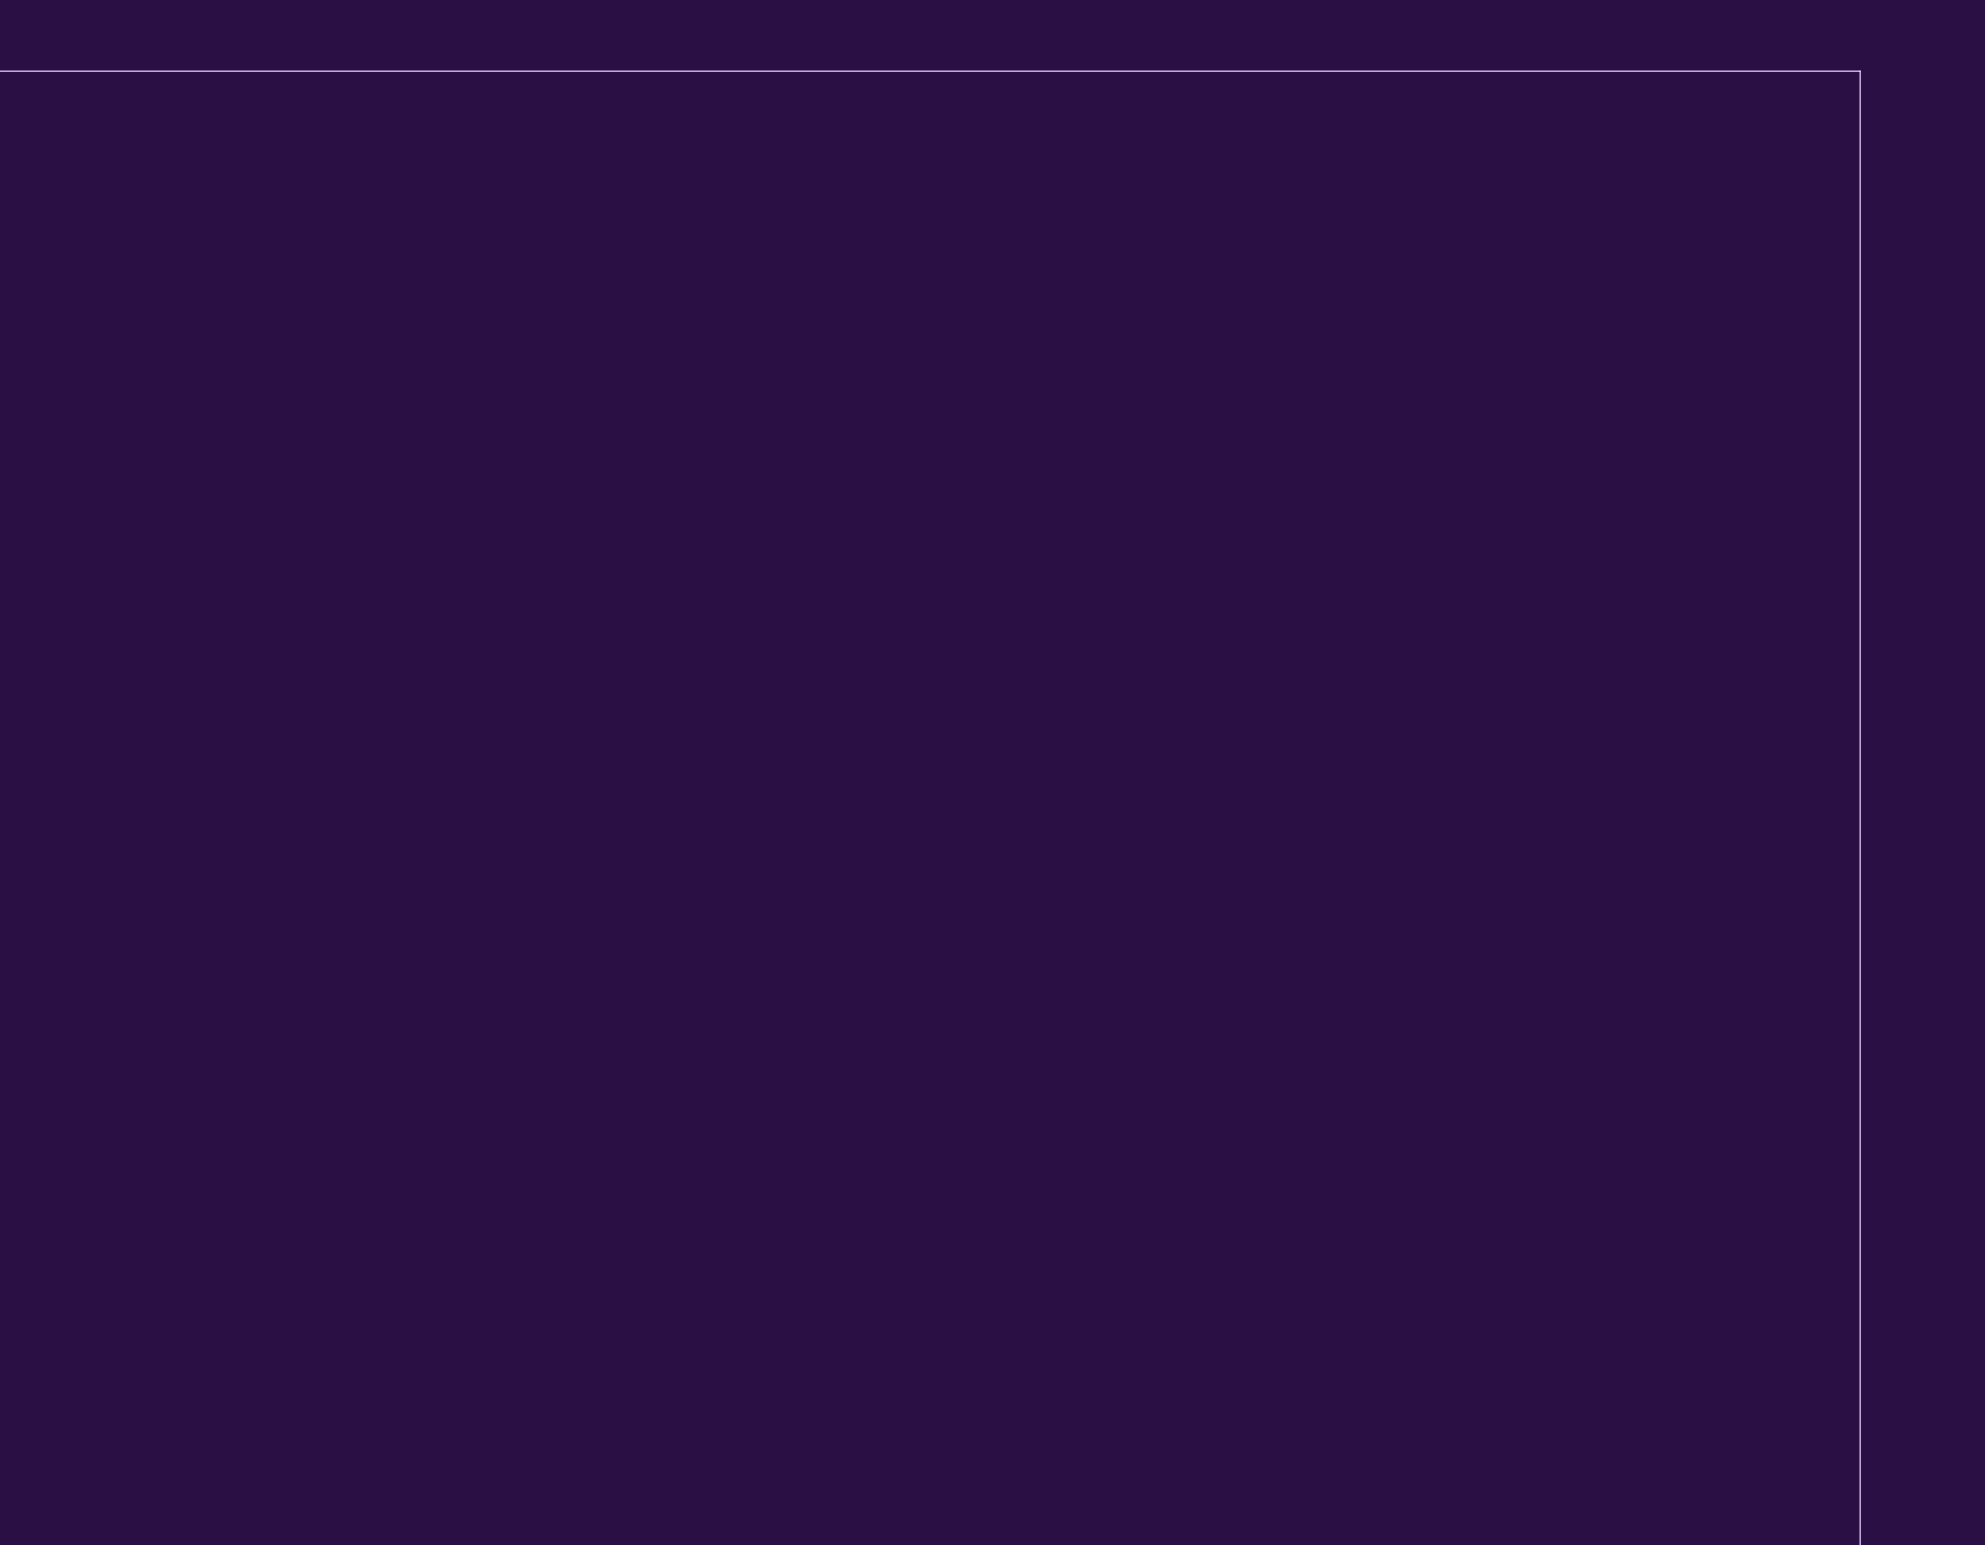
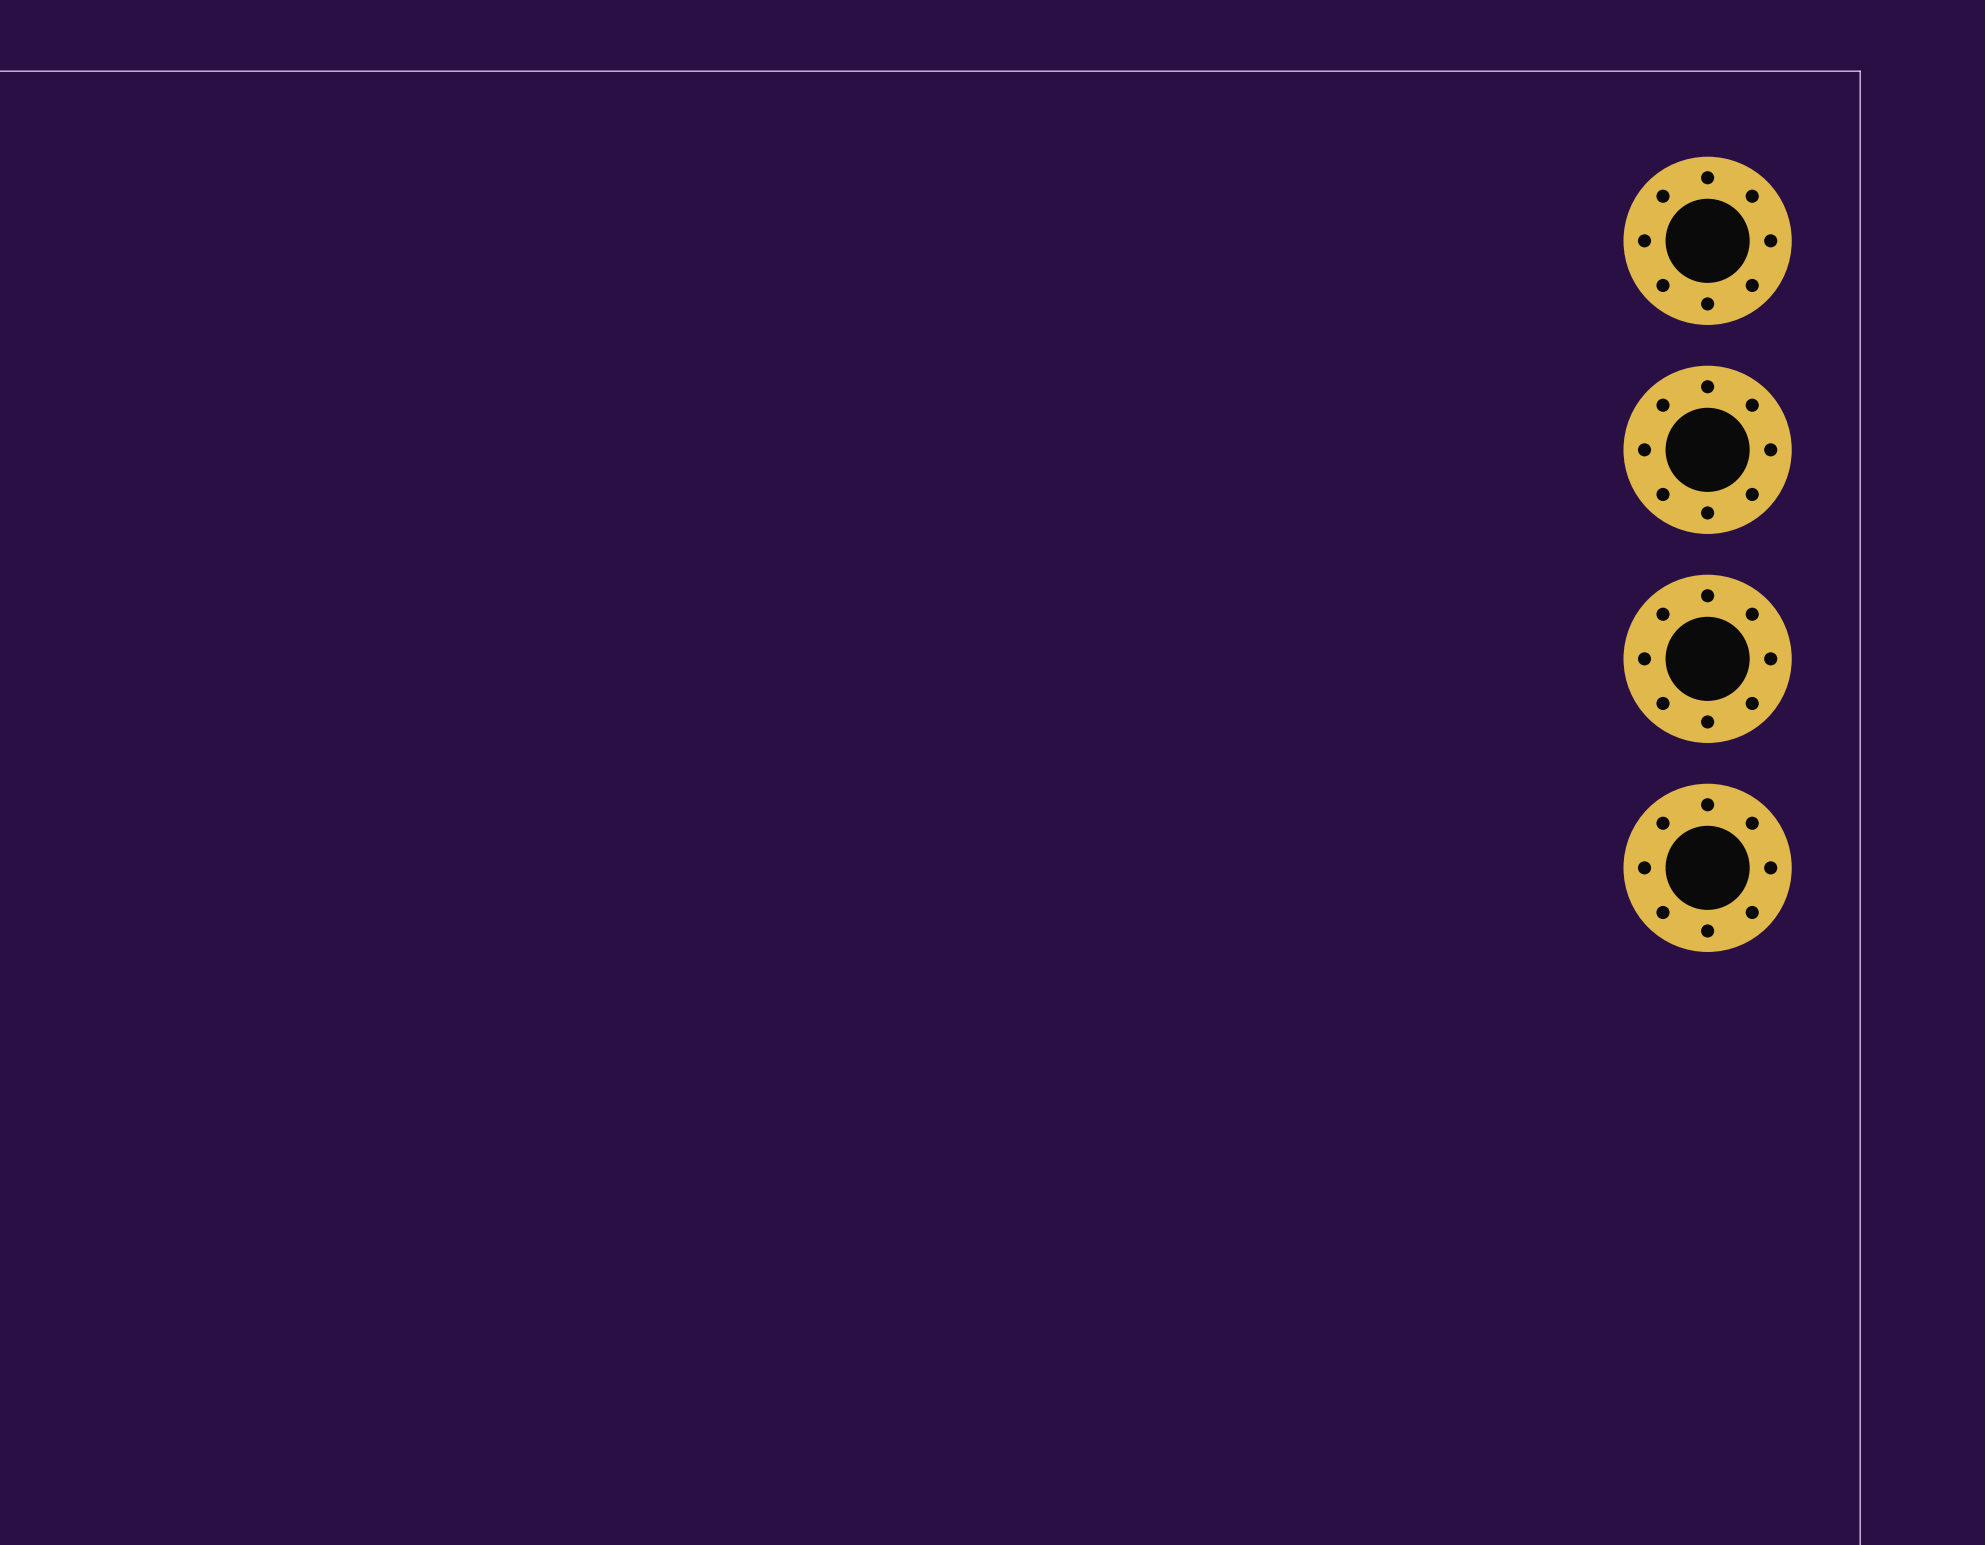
part: none -> (1707, 240)
part: none -> (1707, 449)
part: none -> (1707, 658)
part: none -> (1707, 867)

